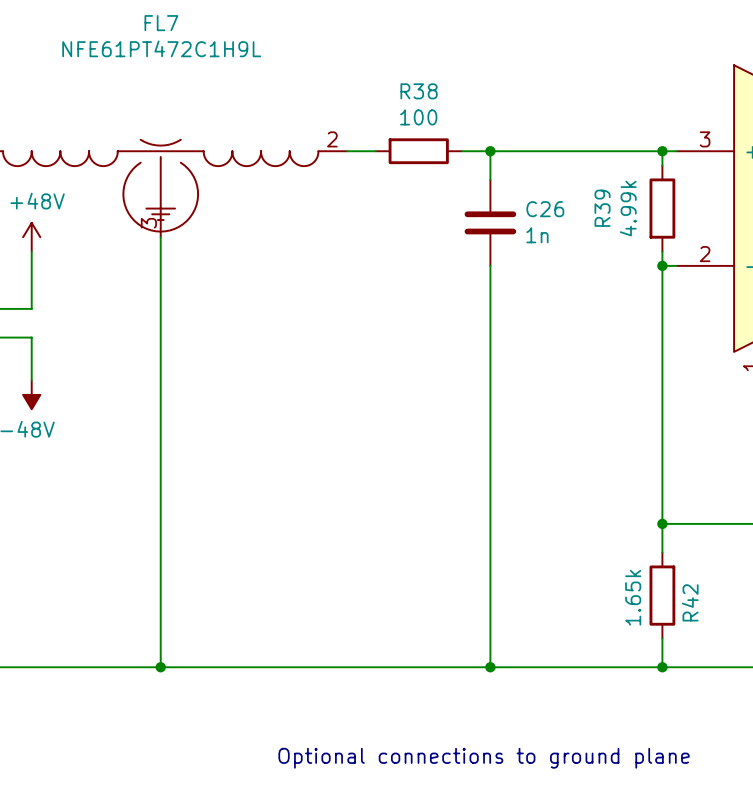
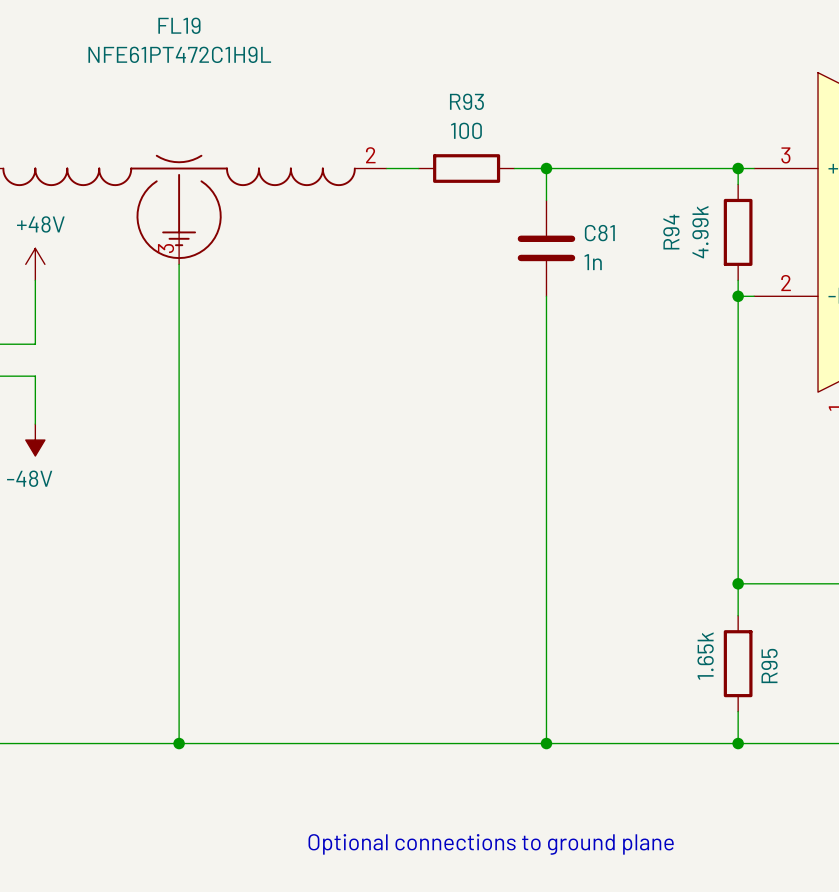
FL7 name: FL7 (161, 23) -> FL19 (179, 25)
R38 name: R38 (419, 91) -> R93 (466, 101)
R39 name: R39 (602, 208) -> R94 (671, 232)
C26 name: C26 (545, 209) -> C81 (599, 233)
R42 name: R42 (690, 602) -> R95 (769, 665)

